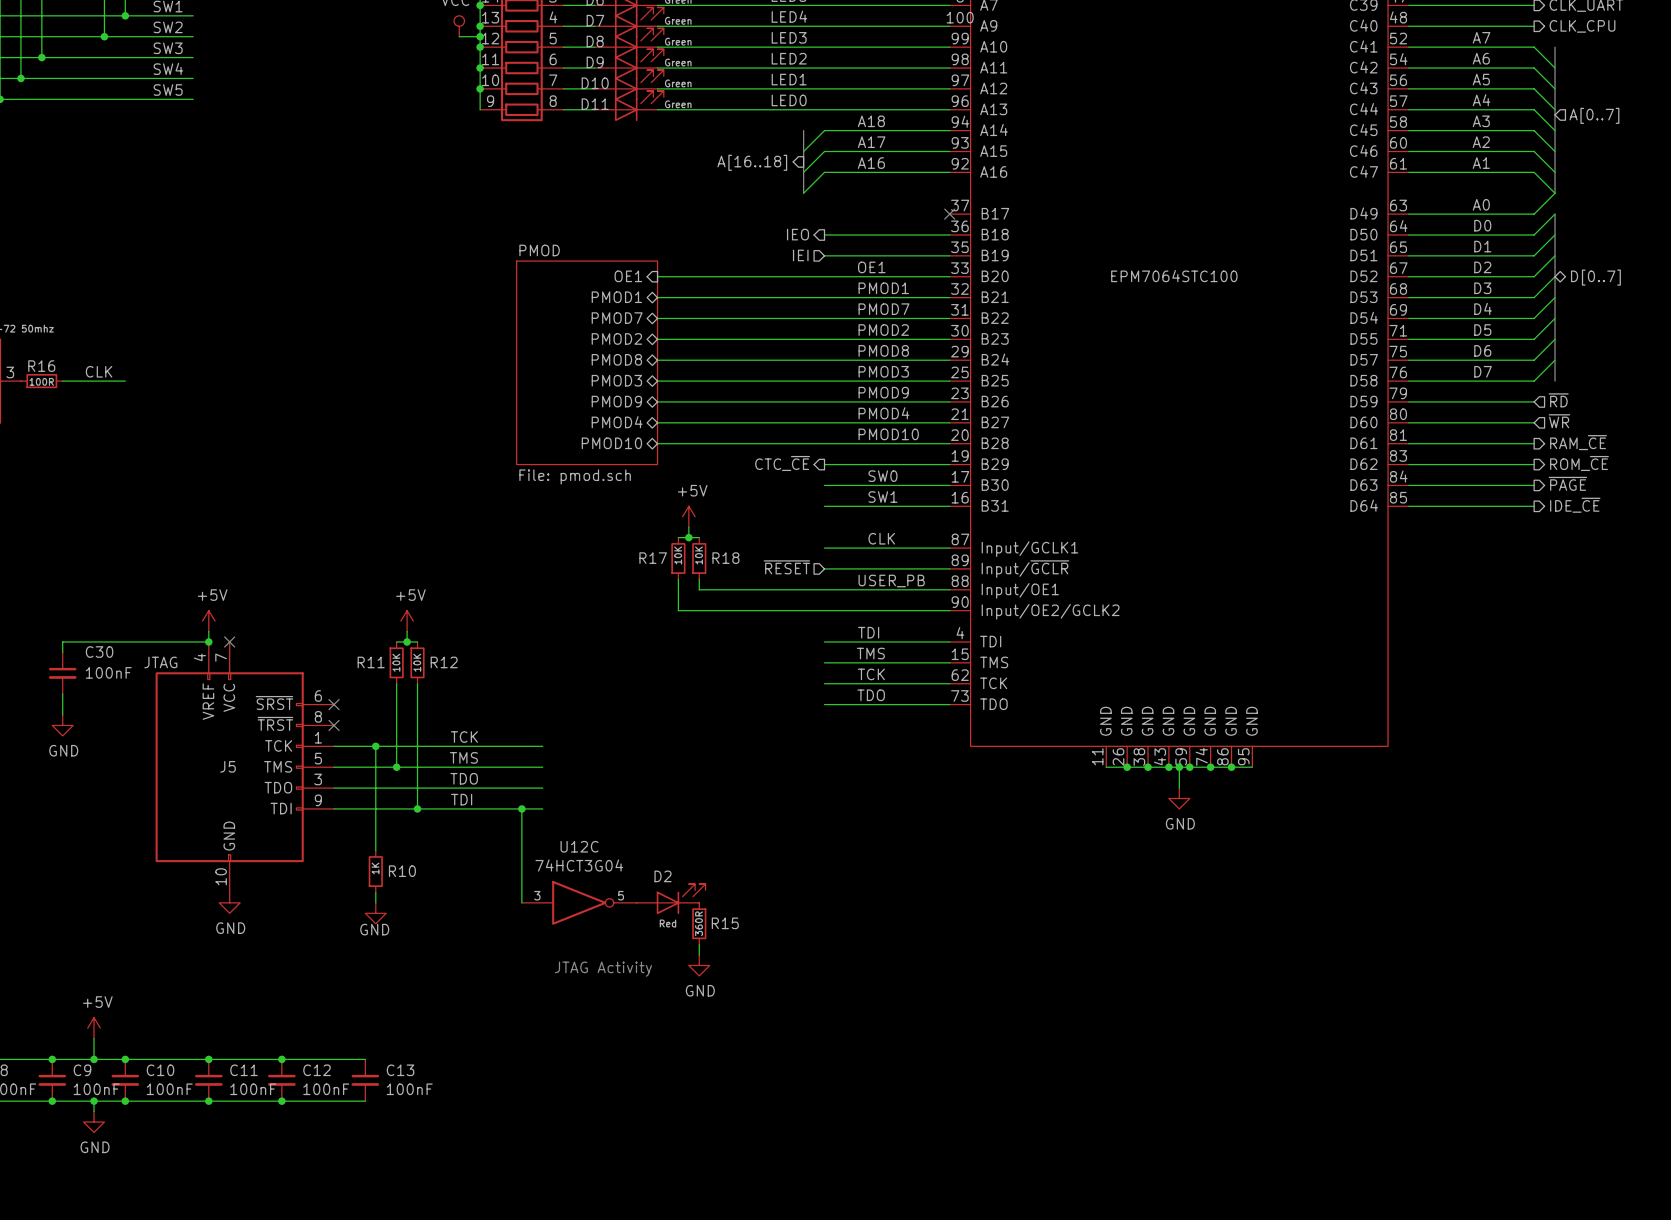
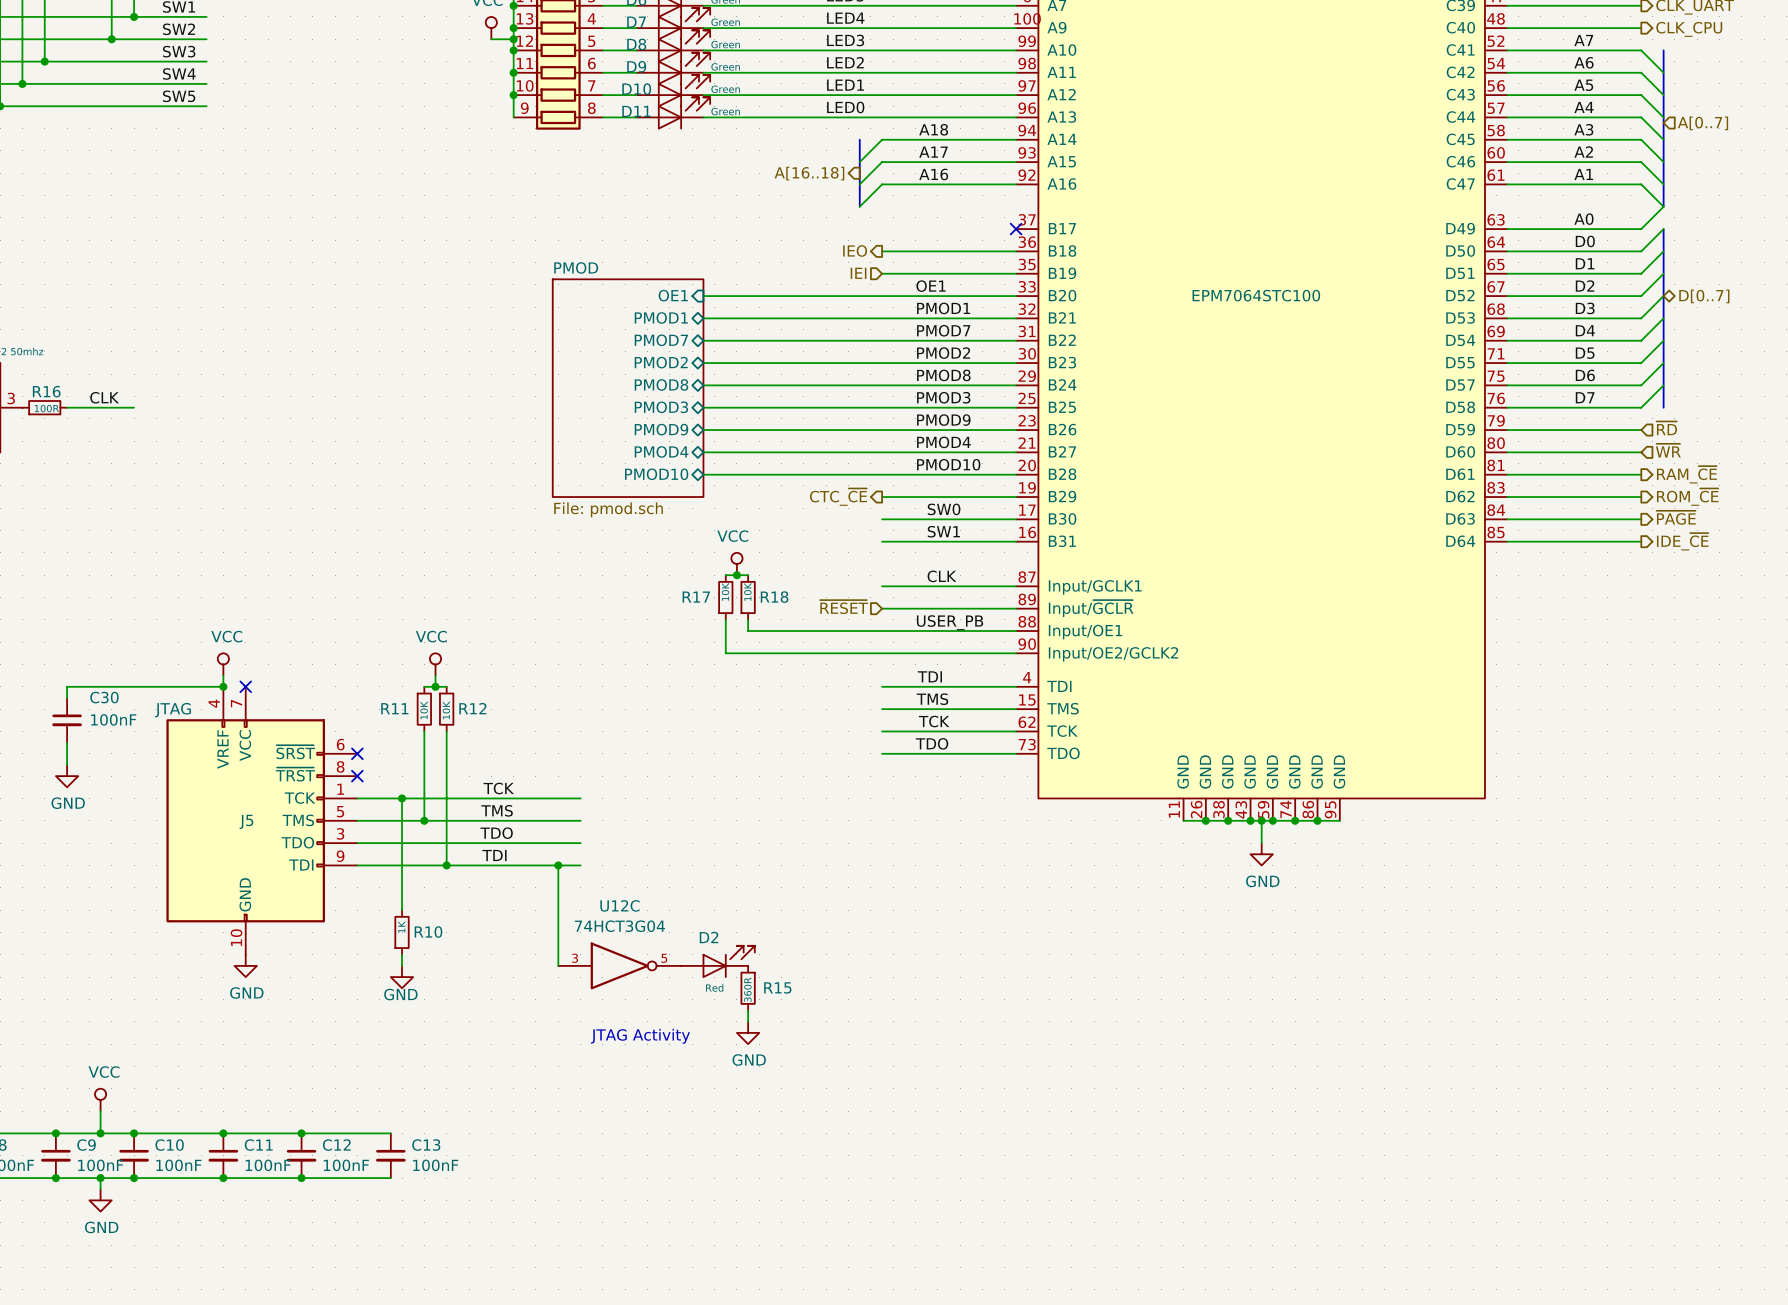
power symbol: +5V (688, 516) -> none
power symbol: none -> VCC (736, 564)
power symbol: +5V (208, 621) -> VCC (223, 664)
power symbol: +5V (407, 621) -> VCC (435, 664)
power symbol: +5V (94, 1028) -> VCC (100, 1099)

